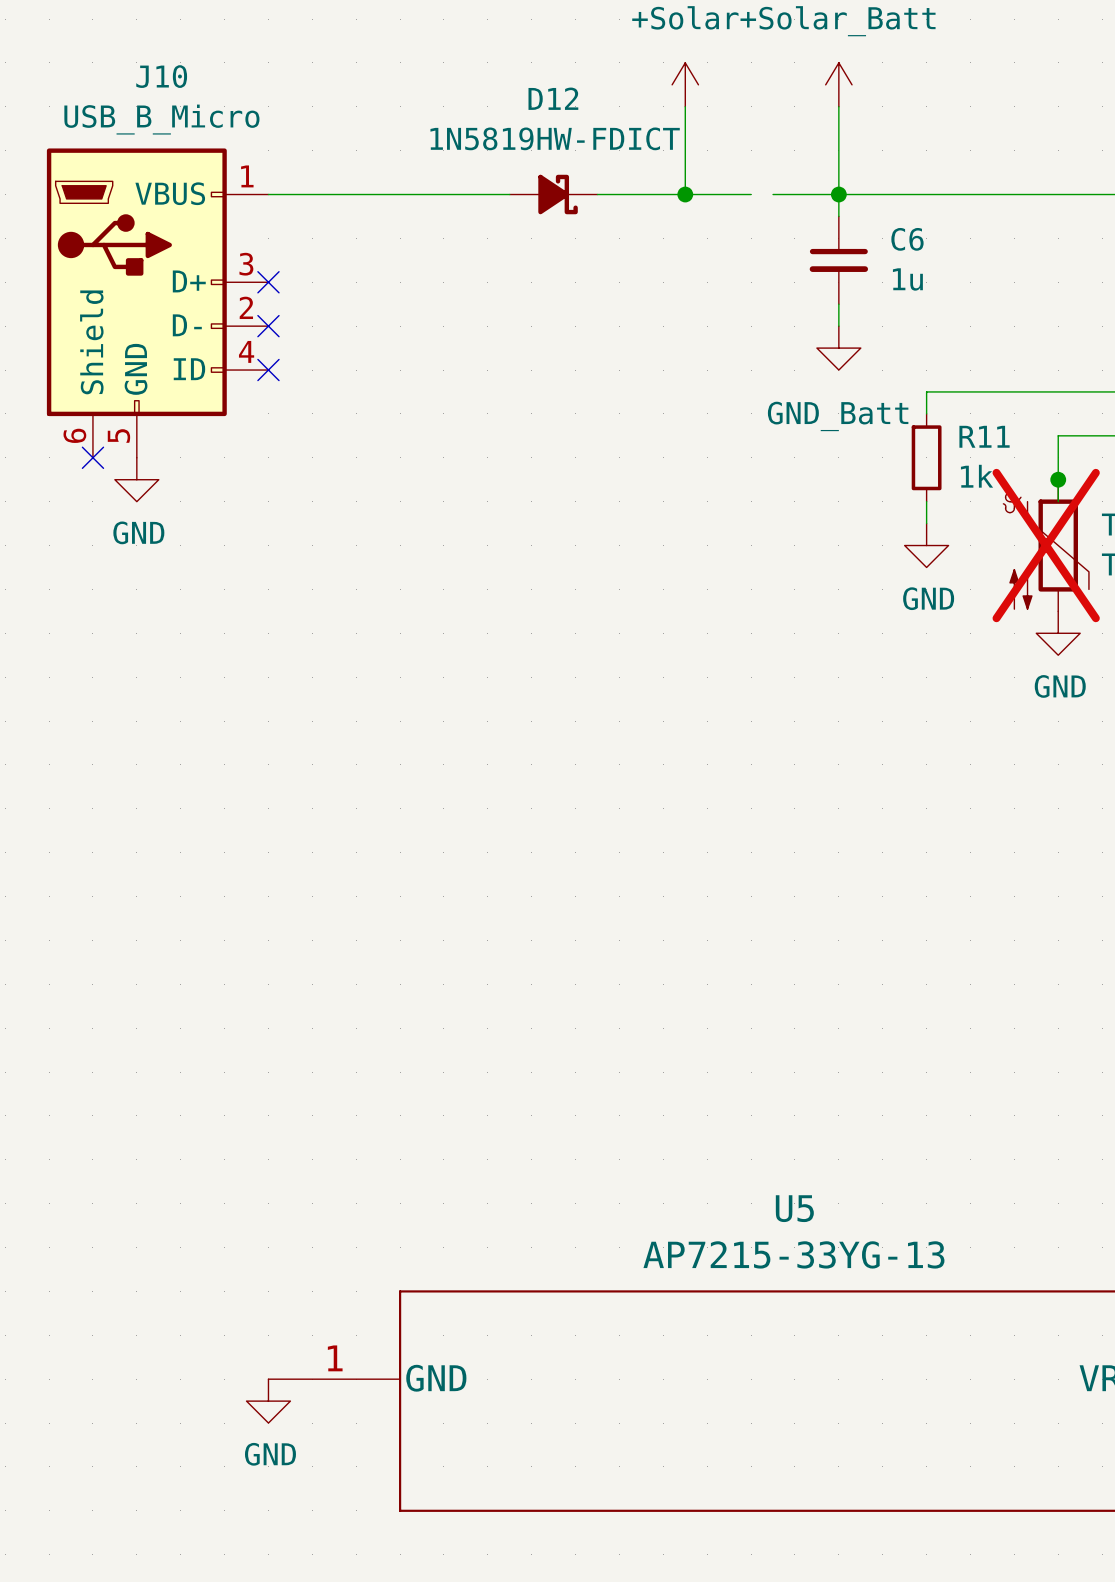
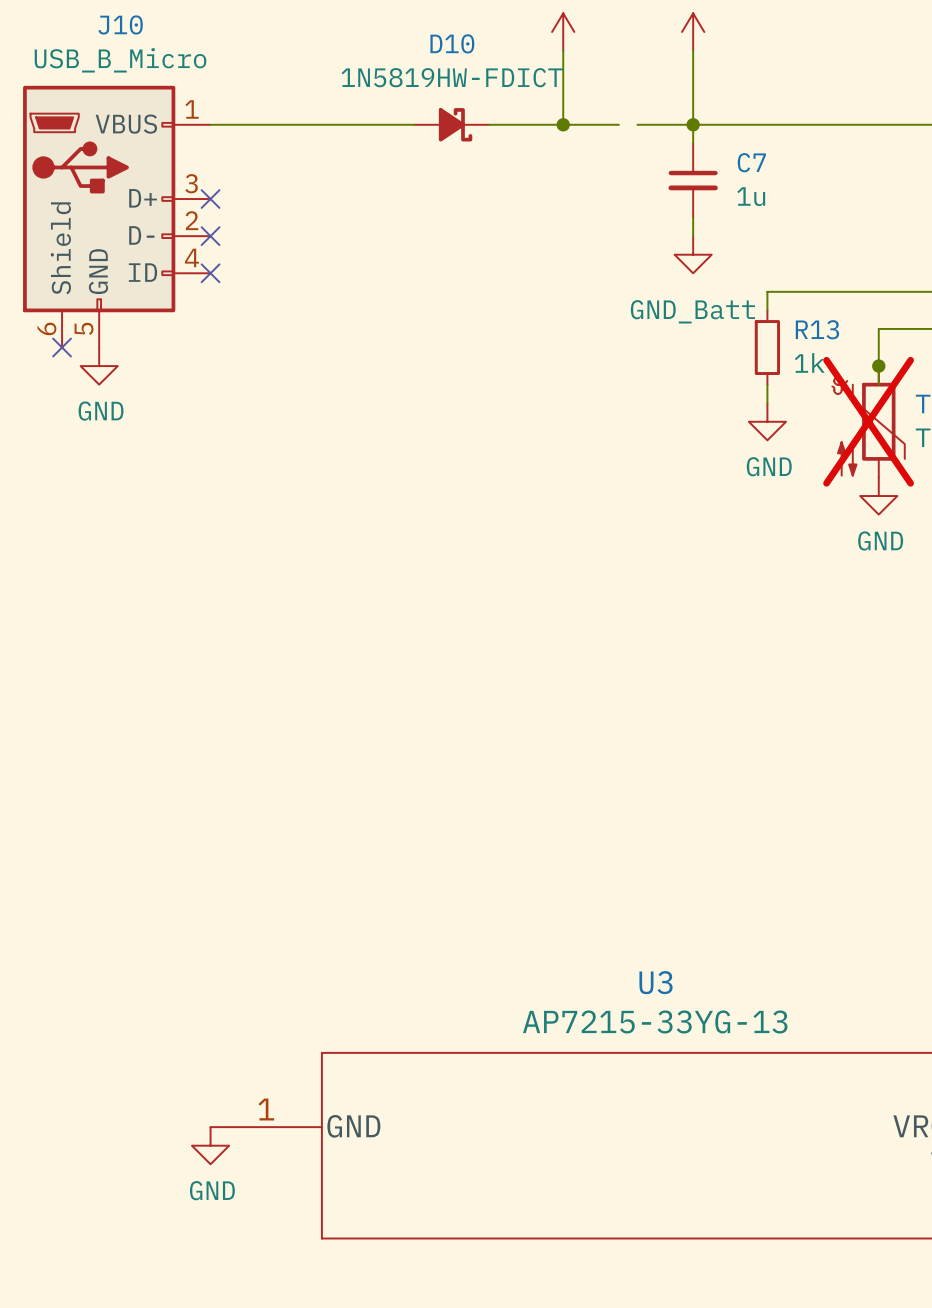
D12 name: D12 (553, 98) -> D10 (452, 43)
C6 name: C6 (907, 239) -> C7 (751, 162)
R11 name: R11 (984, 436) -> R13 (817, 329)
U5 name: U5 (794, 1208) -> U3 (656, 982)

